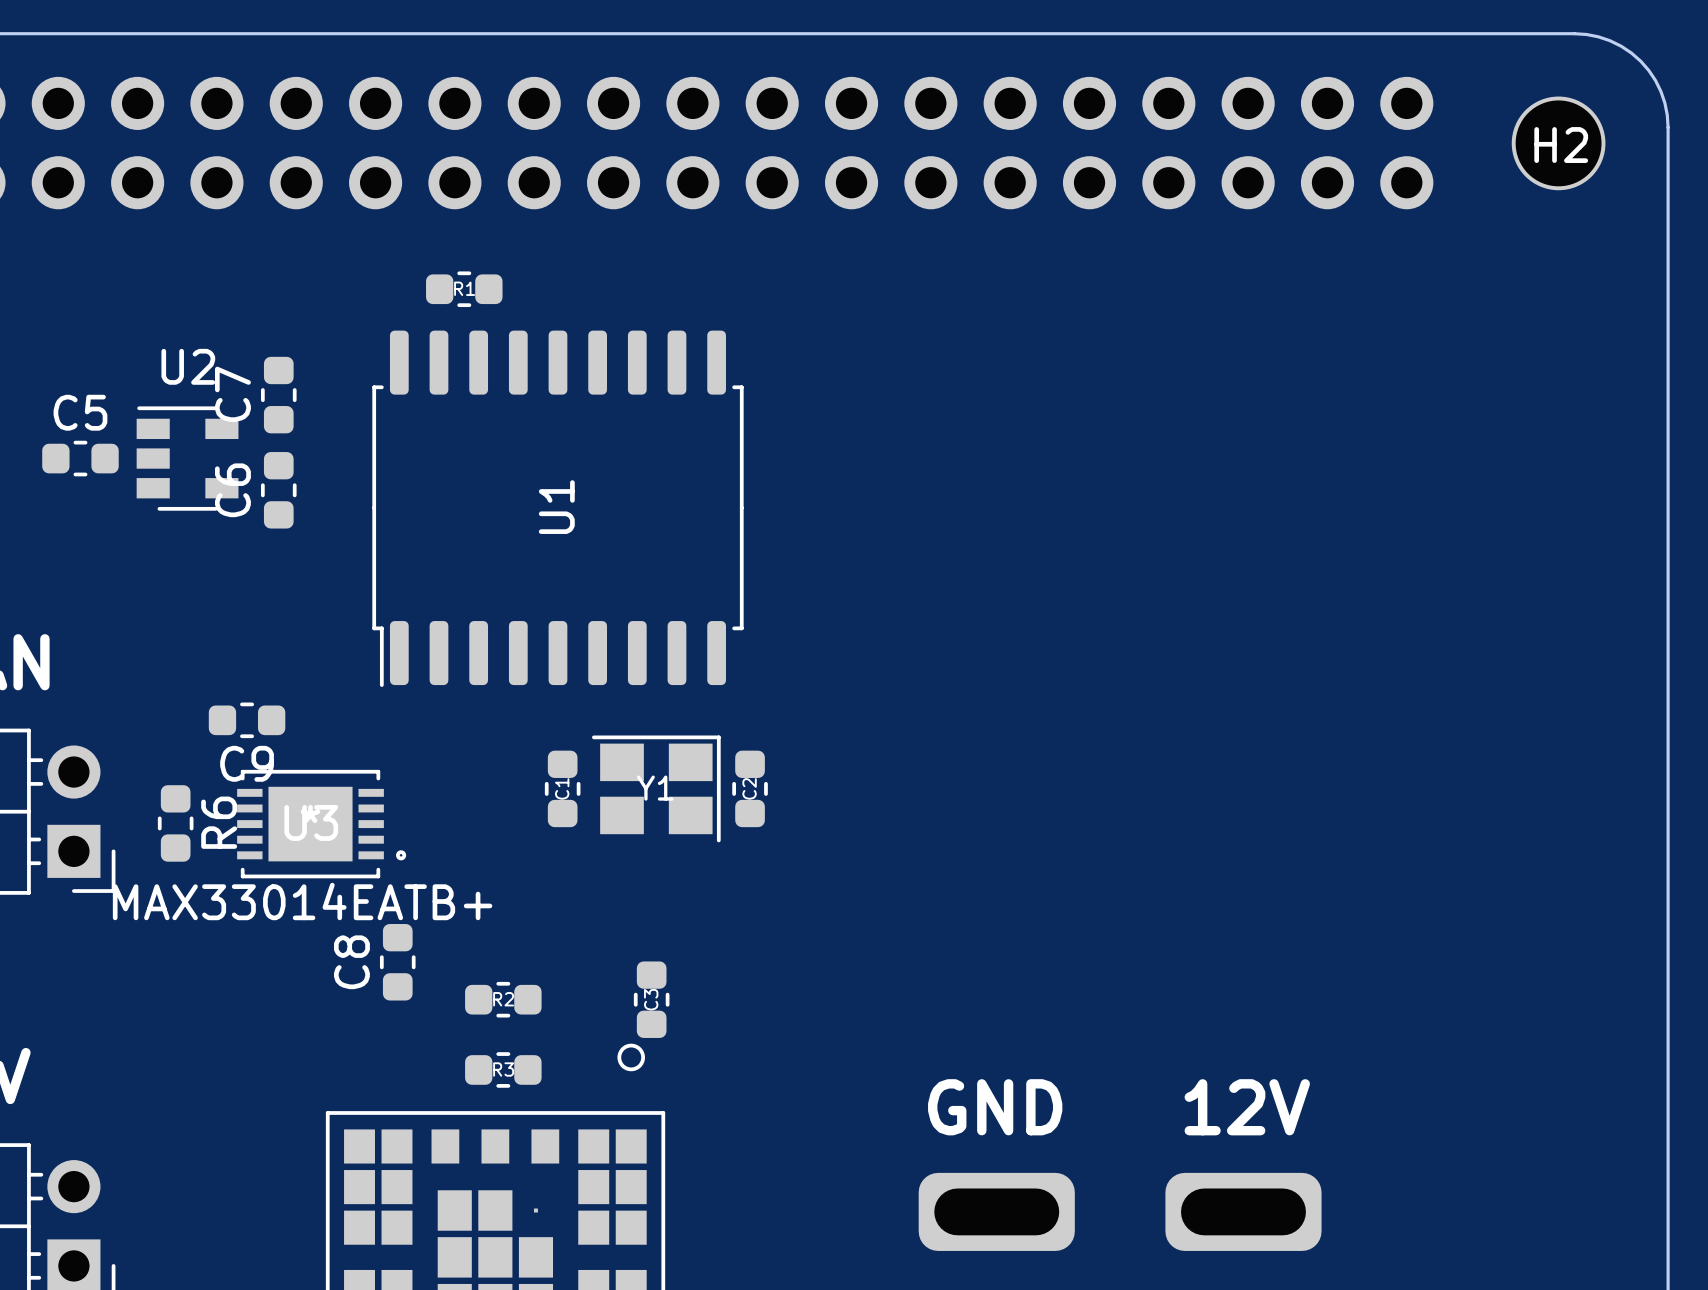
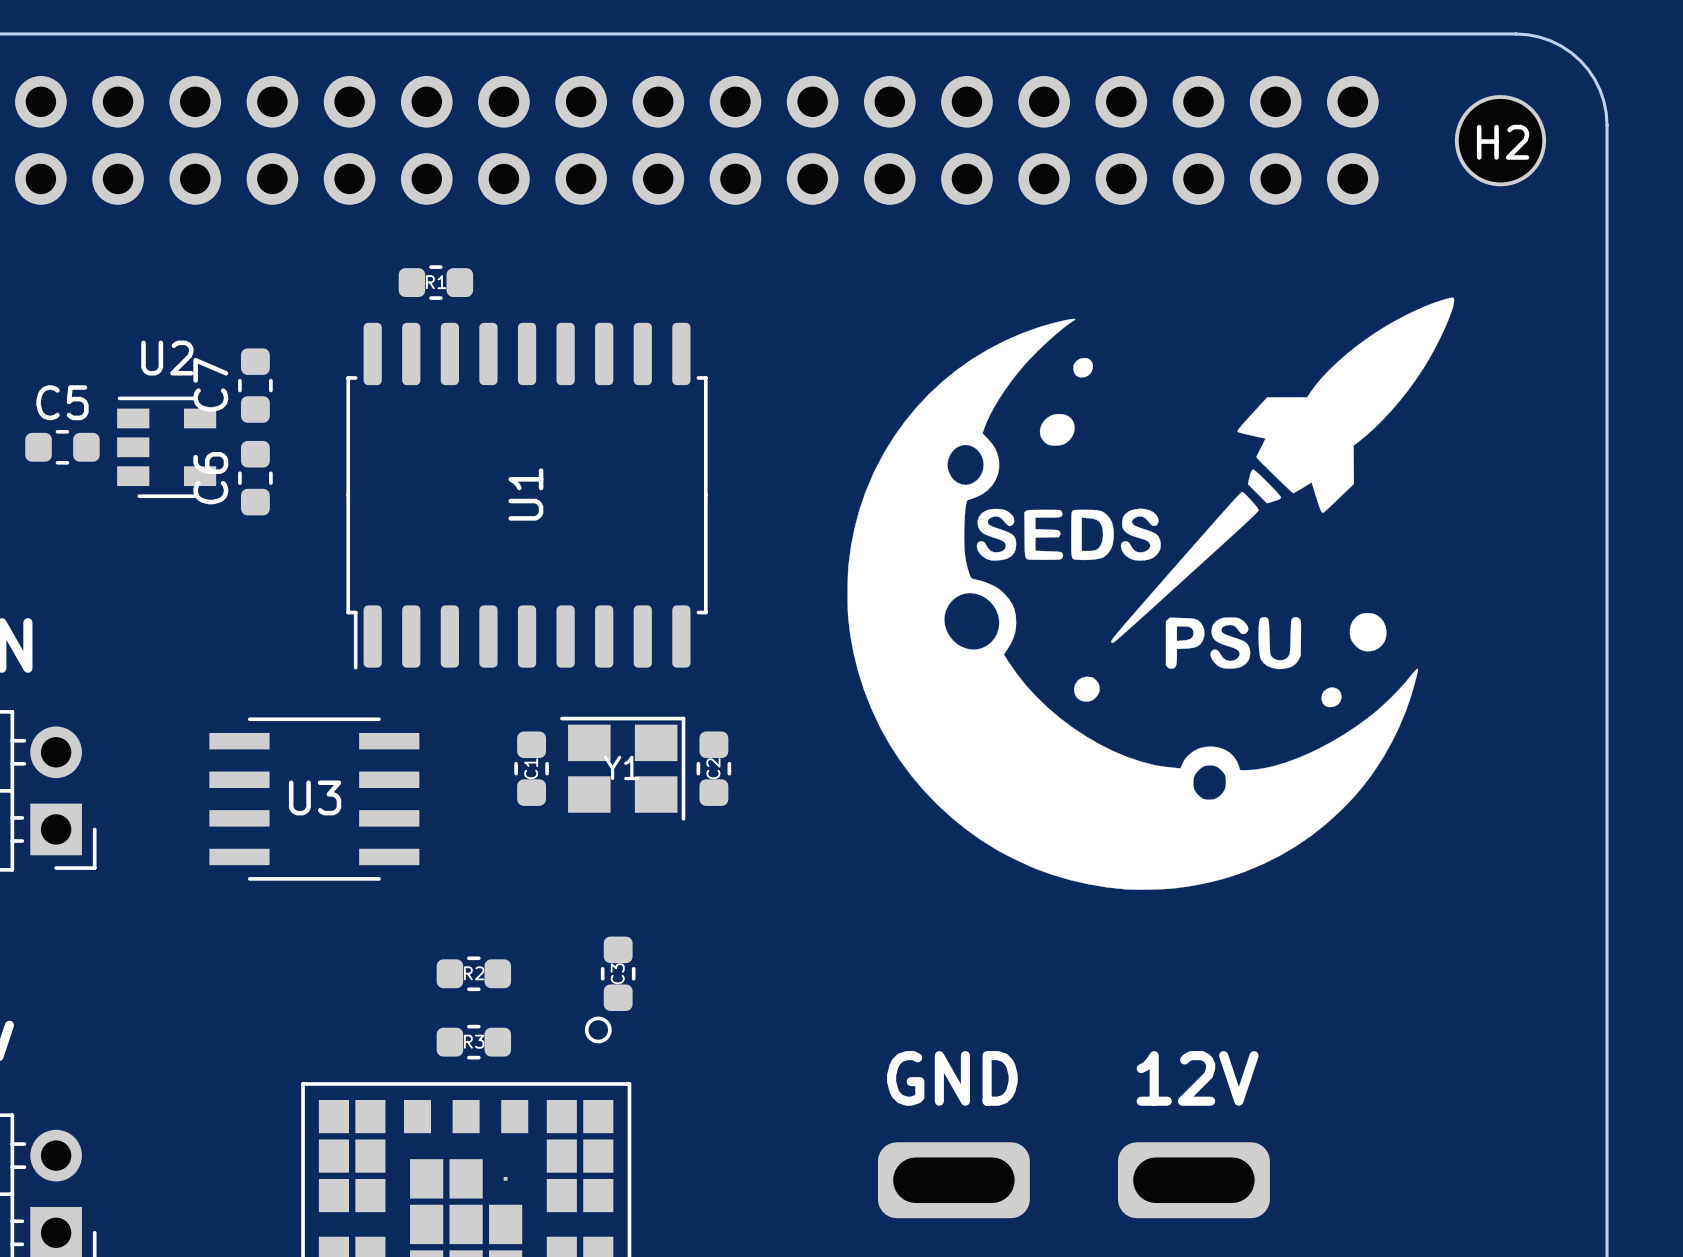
drawing: none -> [847, 297, 1455, 890]
C9: (247, 720) -> none
U3 footprint: [237, 769, 407, 879] -> [209, 717, 420, 881]
R6: (175, 823) -> none
U3 value: MAX33014EATB+ (302, 901) -> none
C8: (397, 962) -> none

